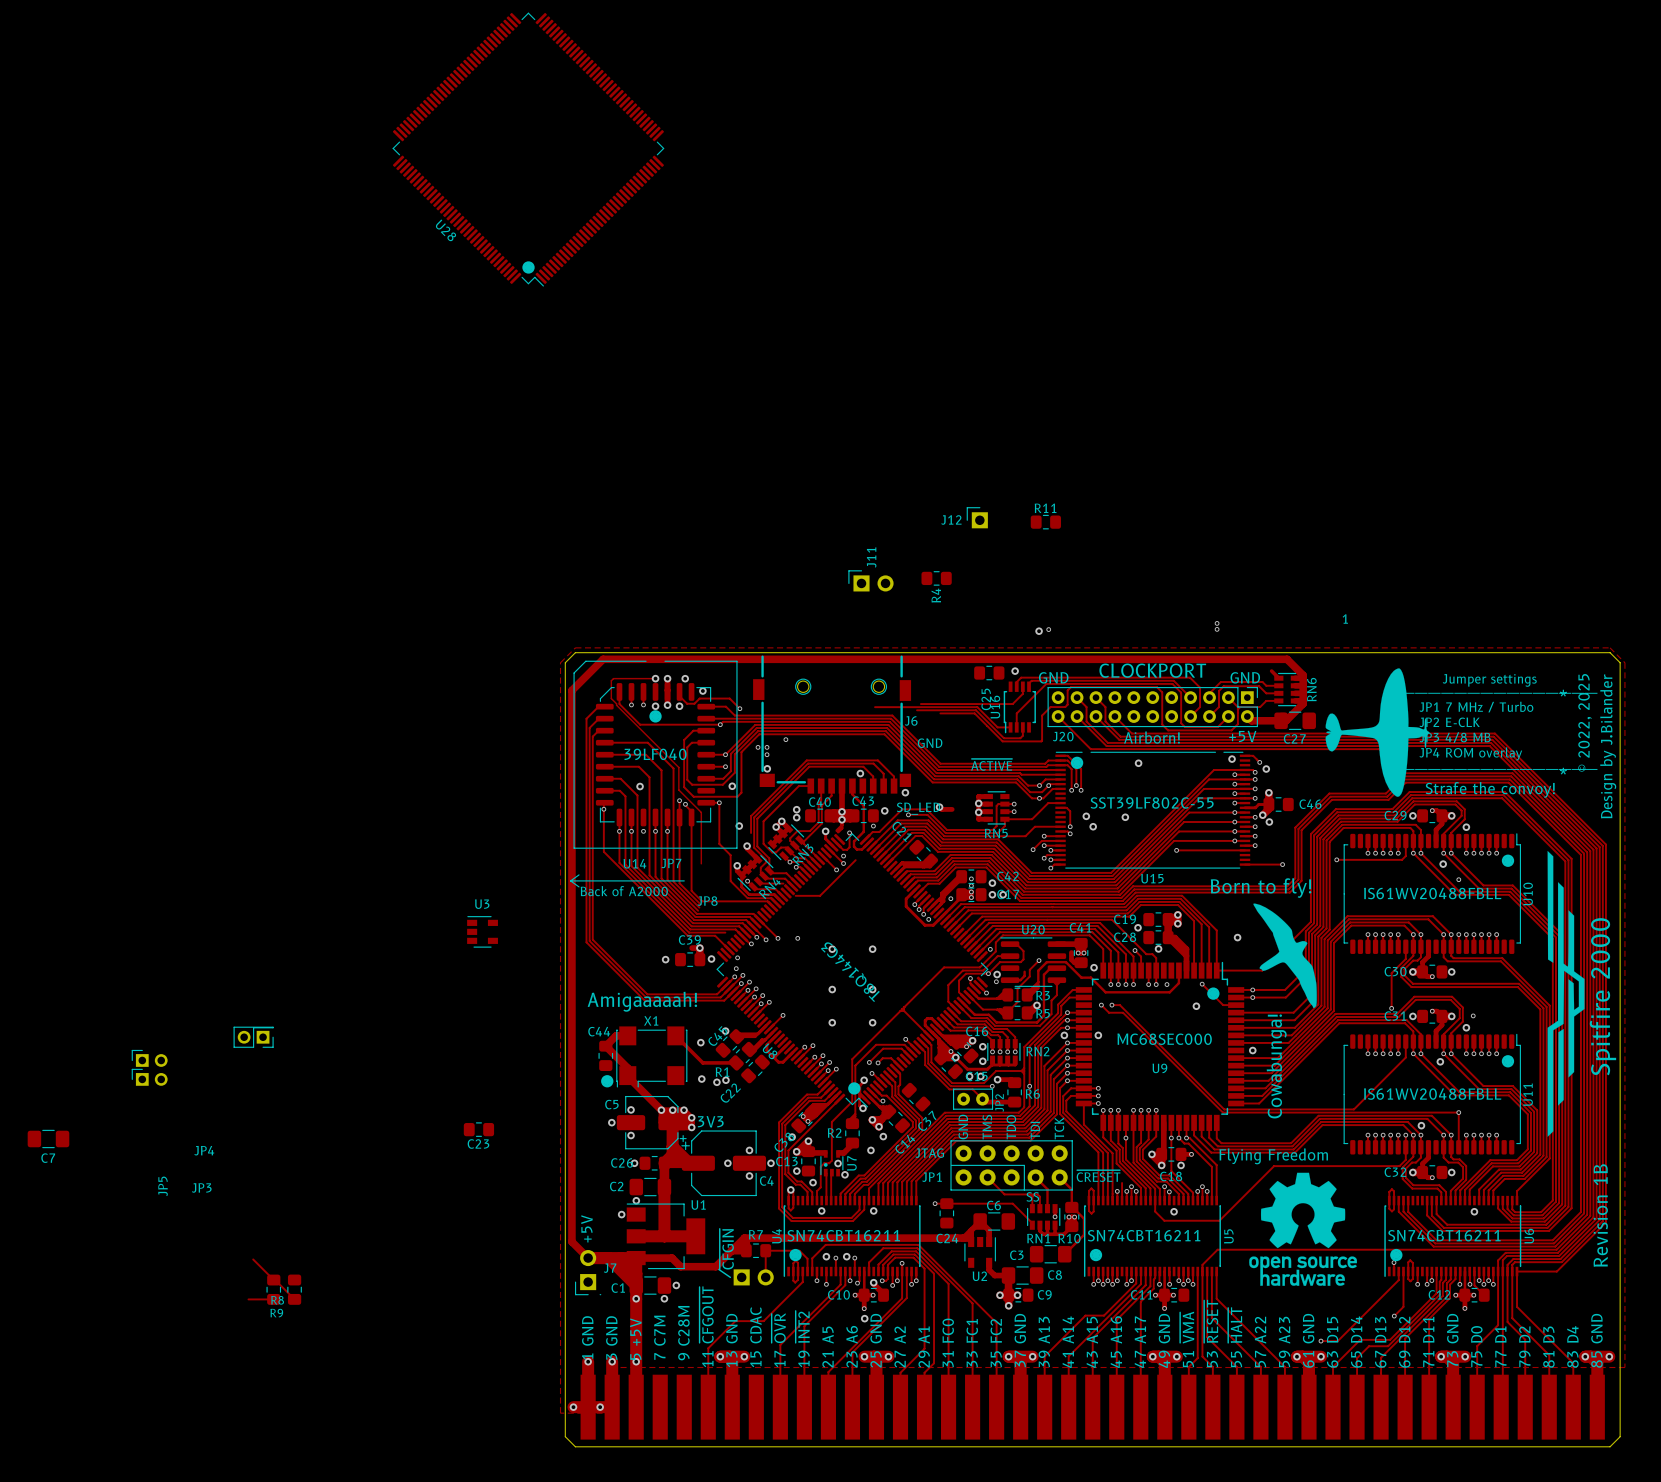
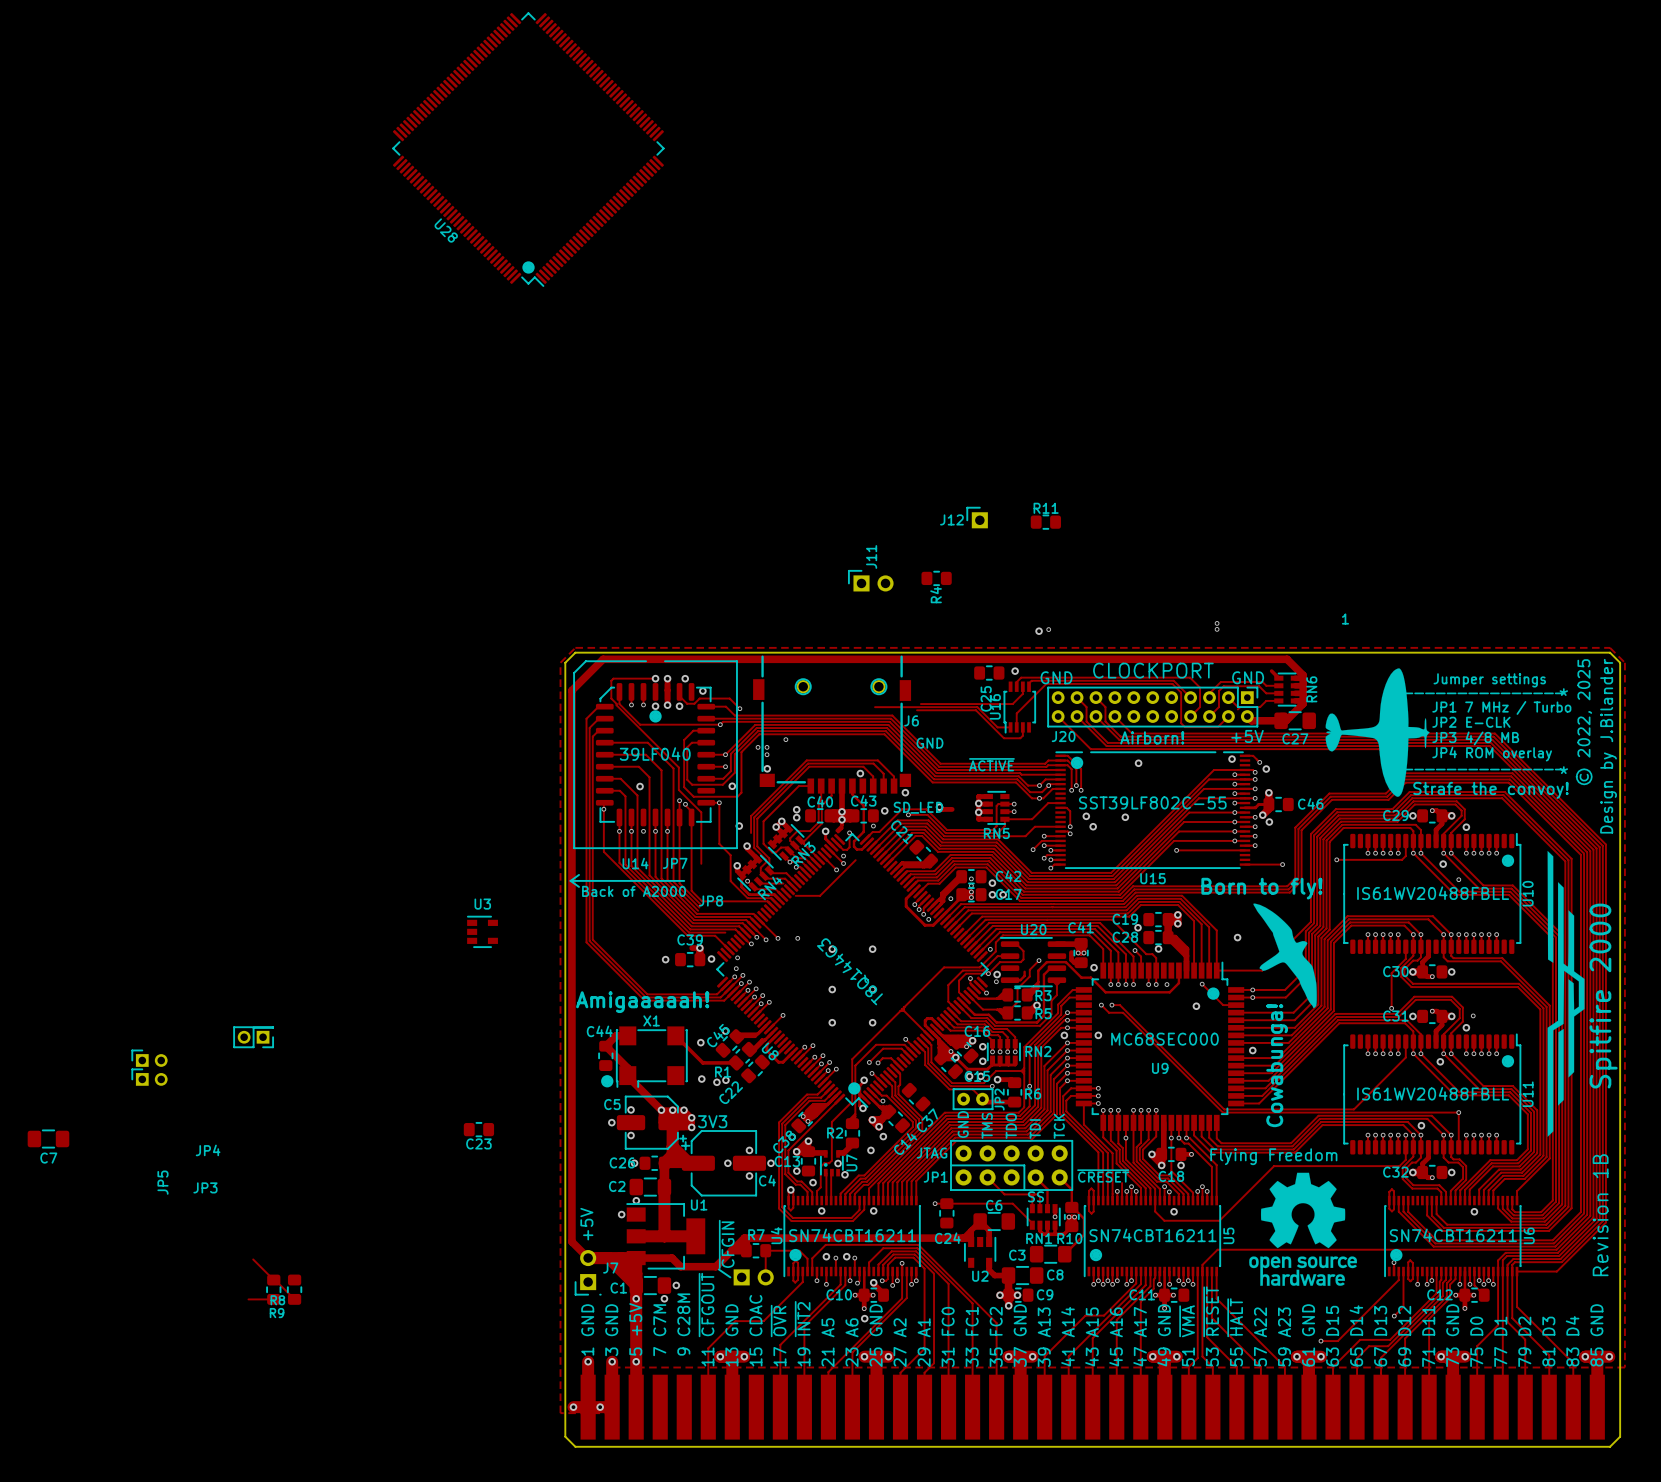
track: (1237, 707) (1237, 724) (1231, 730) (1168, 730) (1162, 724) (1162, 692) (1156, 687) (1071, 687) (1067, 690) (1067, 704) (1065, 707) (1050, 707) (1042, 715) (1041, 741) (1002, 741) (974, 713) (940, 713) -> none

